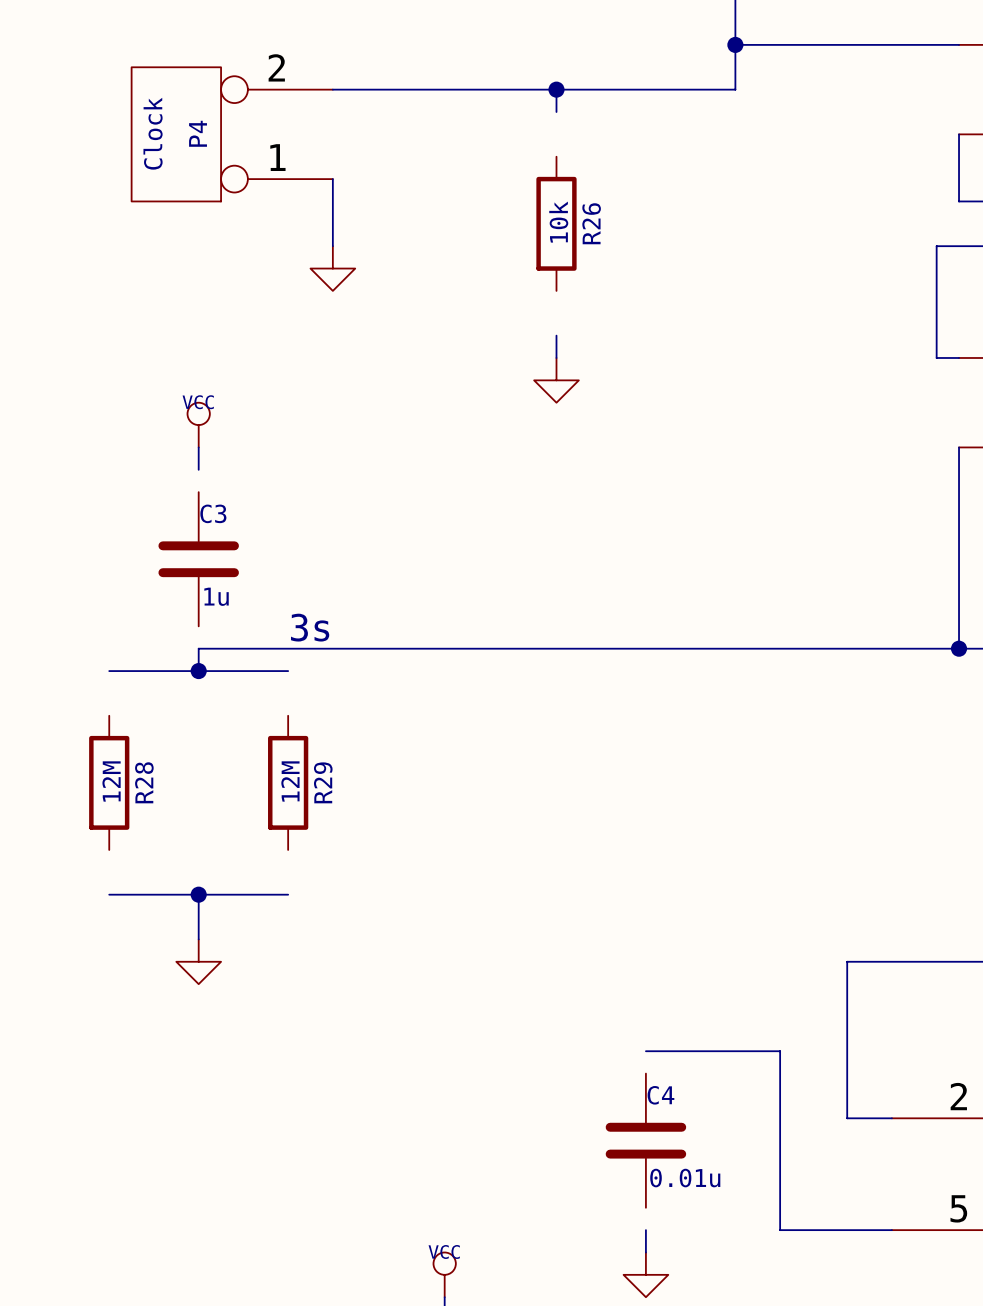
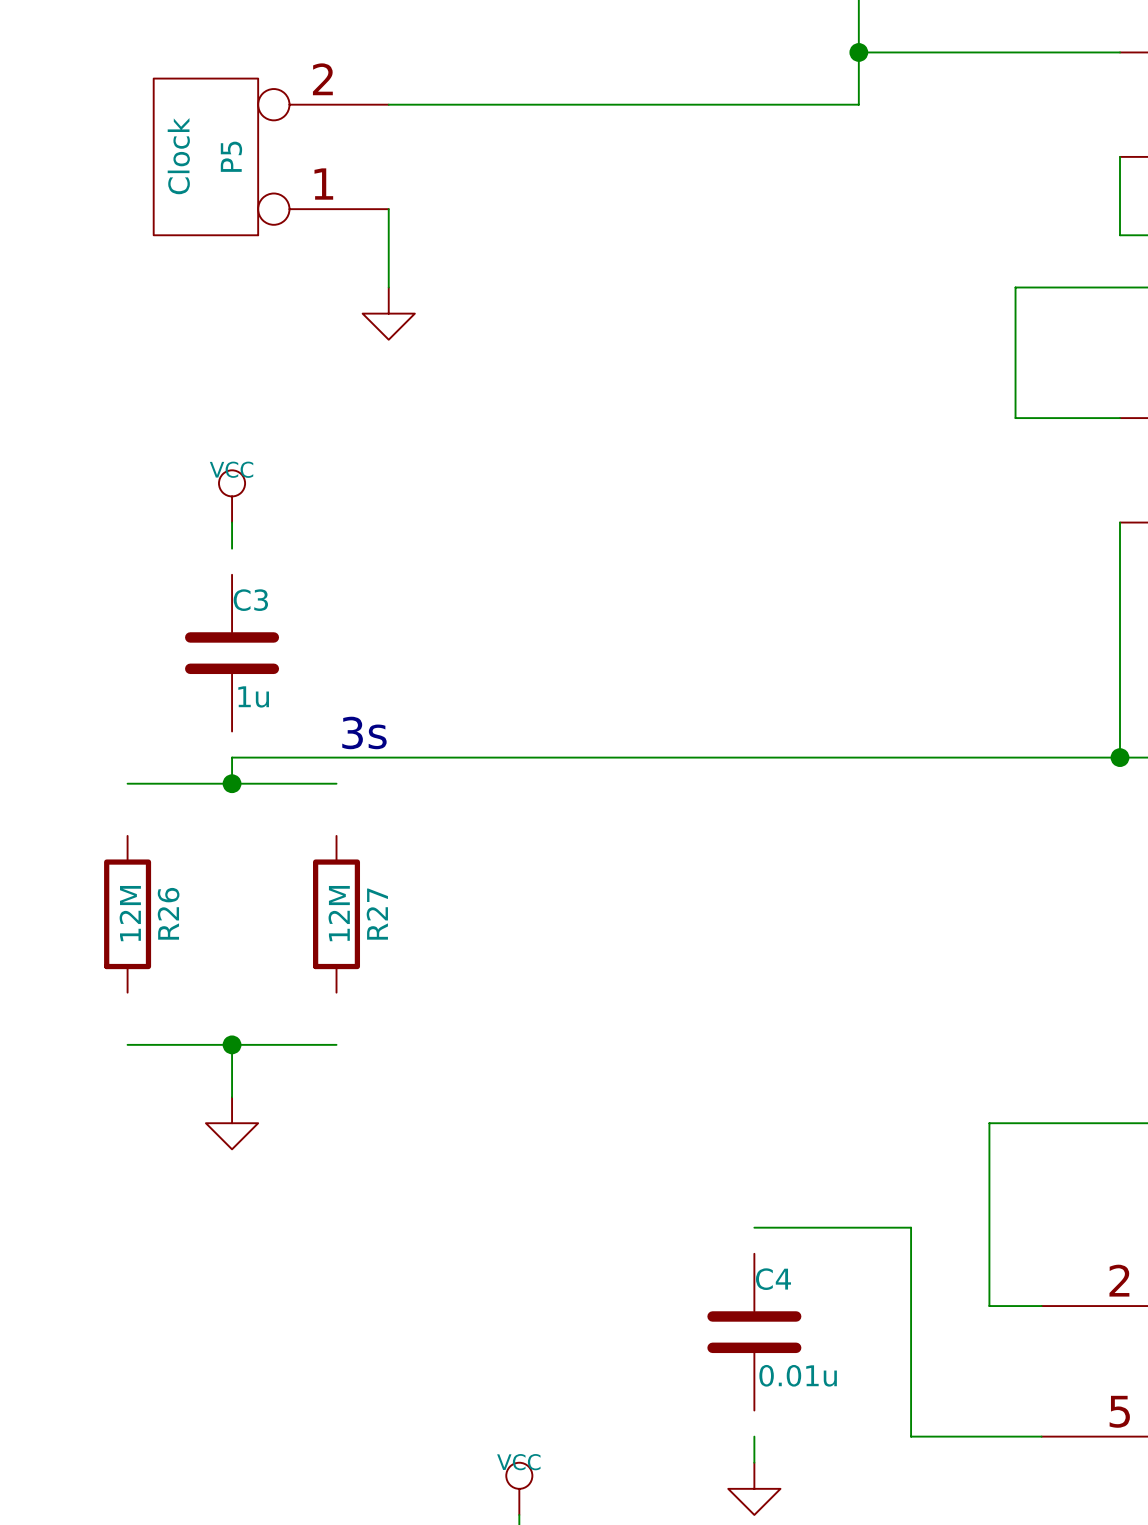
wire: (556, 89) (556, 112) -> none
junction: (556, 89) -> none
P4 name: P4 (198, 133) -> P5 (231, 156)
R26: 10k (556, 223) -> none
wire: (936, 246) (936, 357) -> (1093, 287) (1015, 287) (1015, 418) (1093, 418)
wire: (556, 335) (556, 357) -> none
power symbol: (556, 380) -> none
R28 name: R28 (144, 782) -> R26 (168, 913)
R29 name: R29 (323, 782) -> R27 (377, 914)

